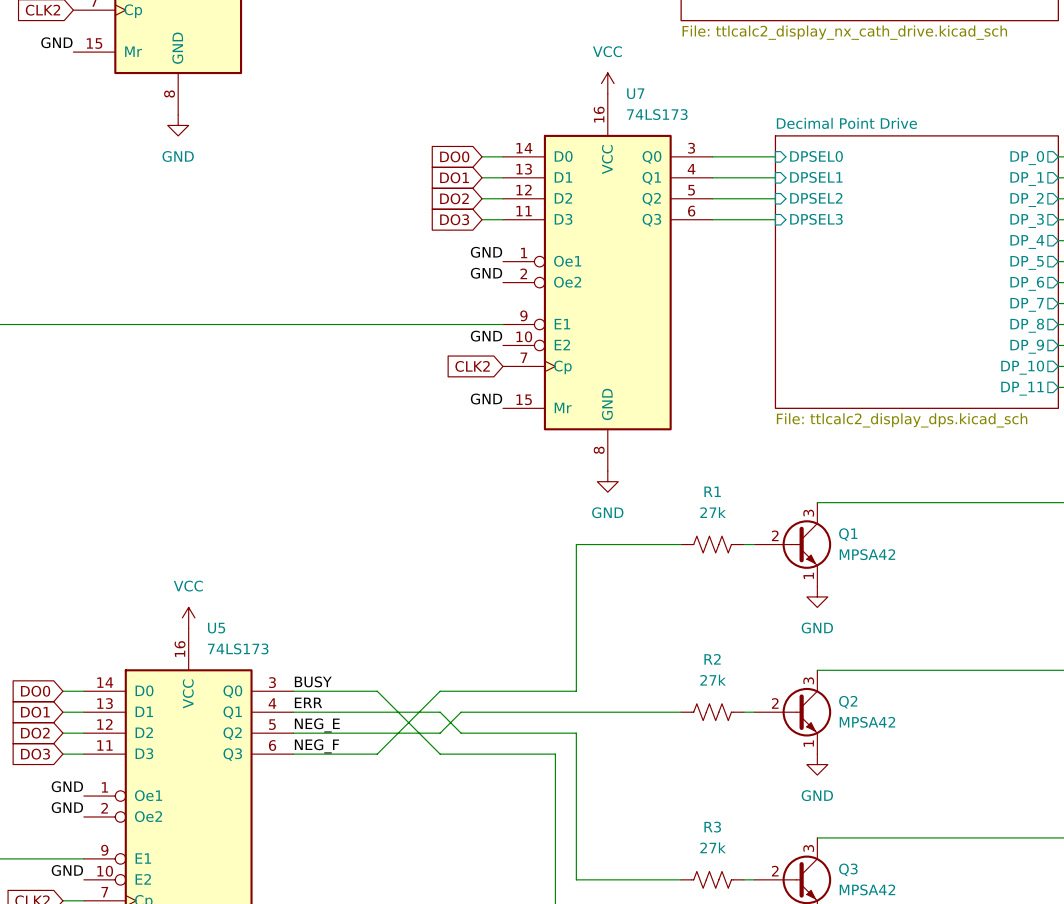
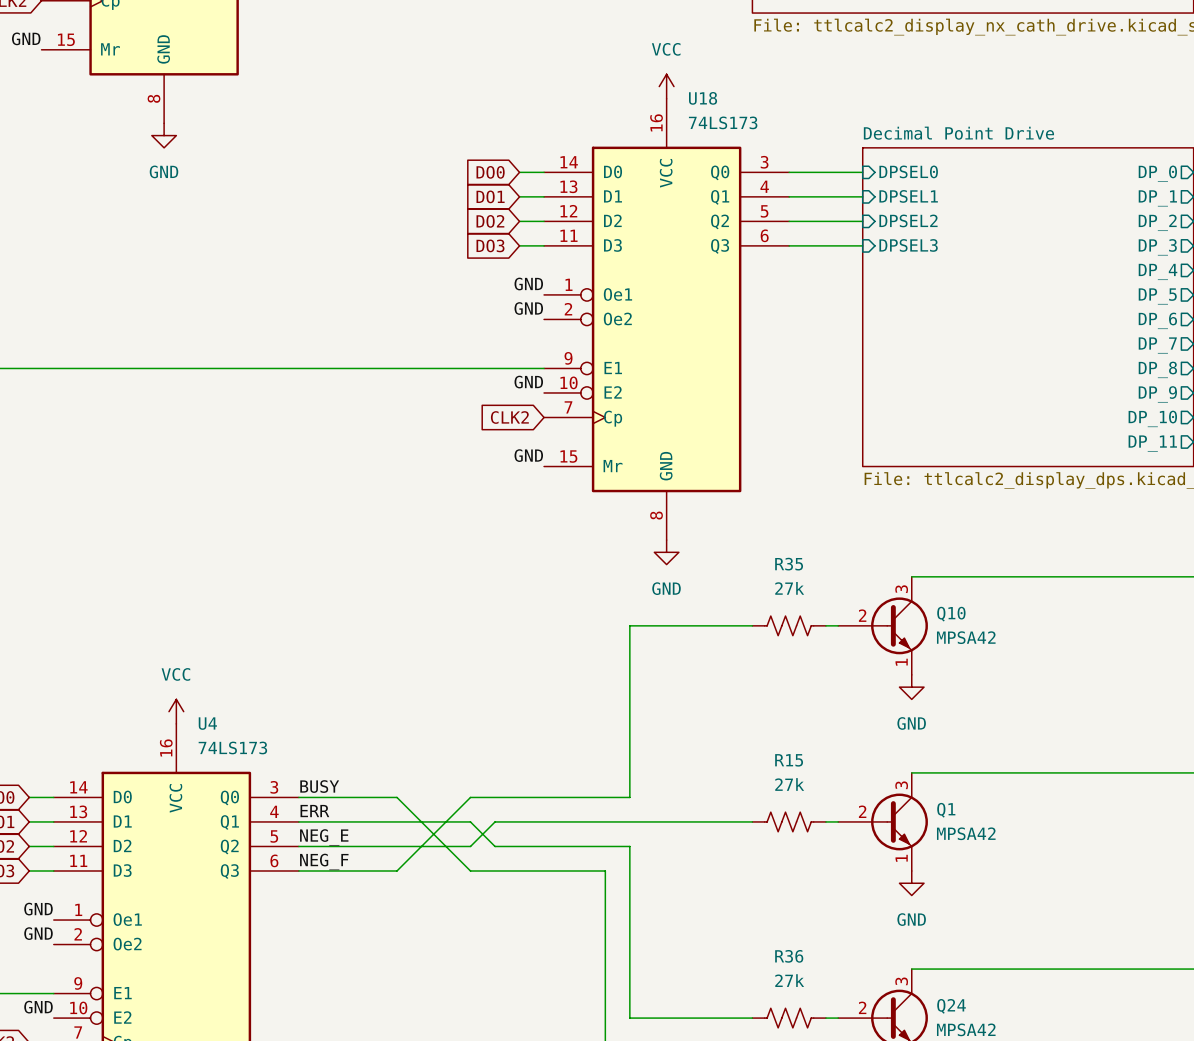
U7 name: U7 (635, 93) -> U18 (703, 98)
R1 name: R1 (712, 491) -> R35 (789, 564)
Q1 name: Q1 (848, 534) -> Q10 (951, 614)
U5 name: U5 (216, 628) -> U4 (207, 723)
R2 name: R2 (712, 659) -> R15 (789, 760)
Q2 name: Q2 (848, 702) -> Q1 (946, 810)
R3 name: R3 (712, 827) -> R36 (789, 956)
Q3 name: Q3 (848, 869) -> Q24 (951, 1006)

